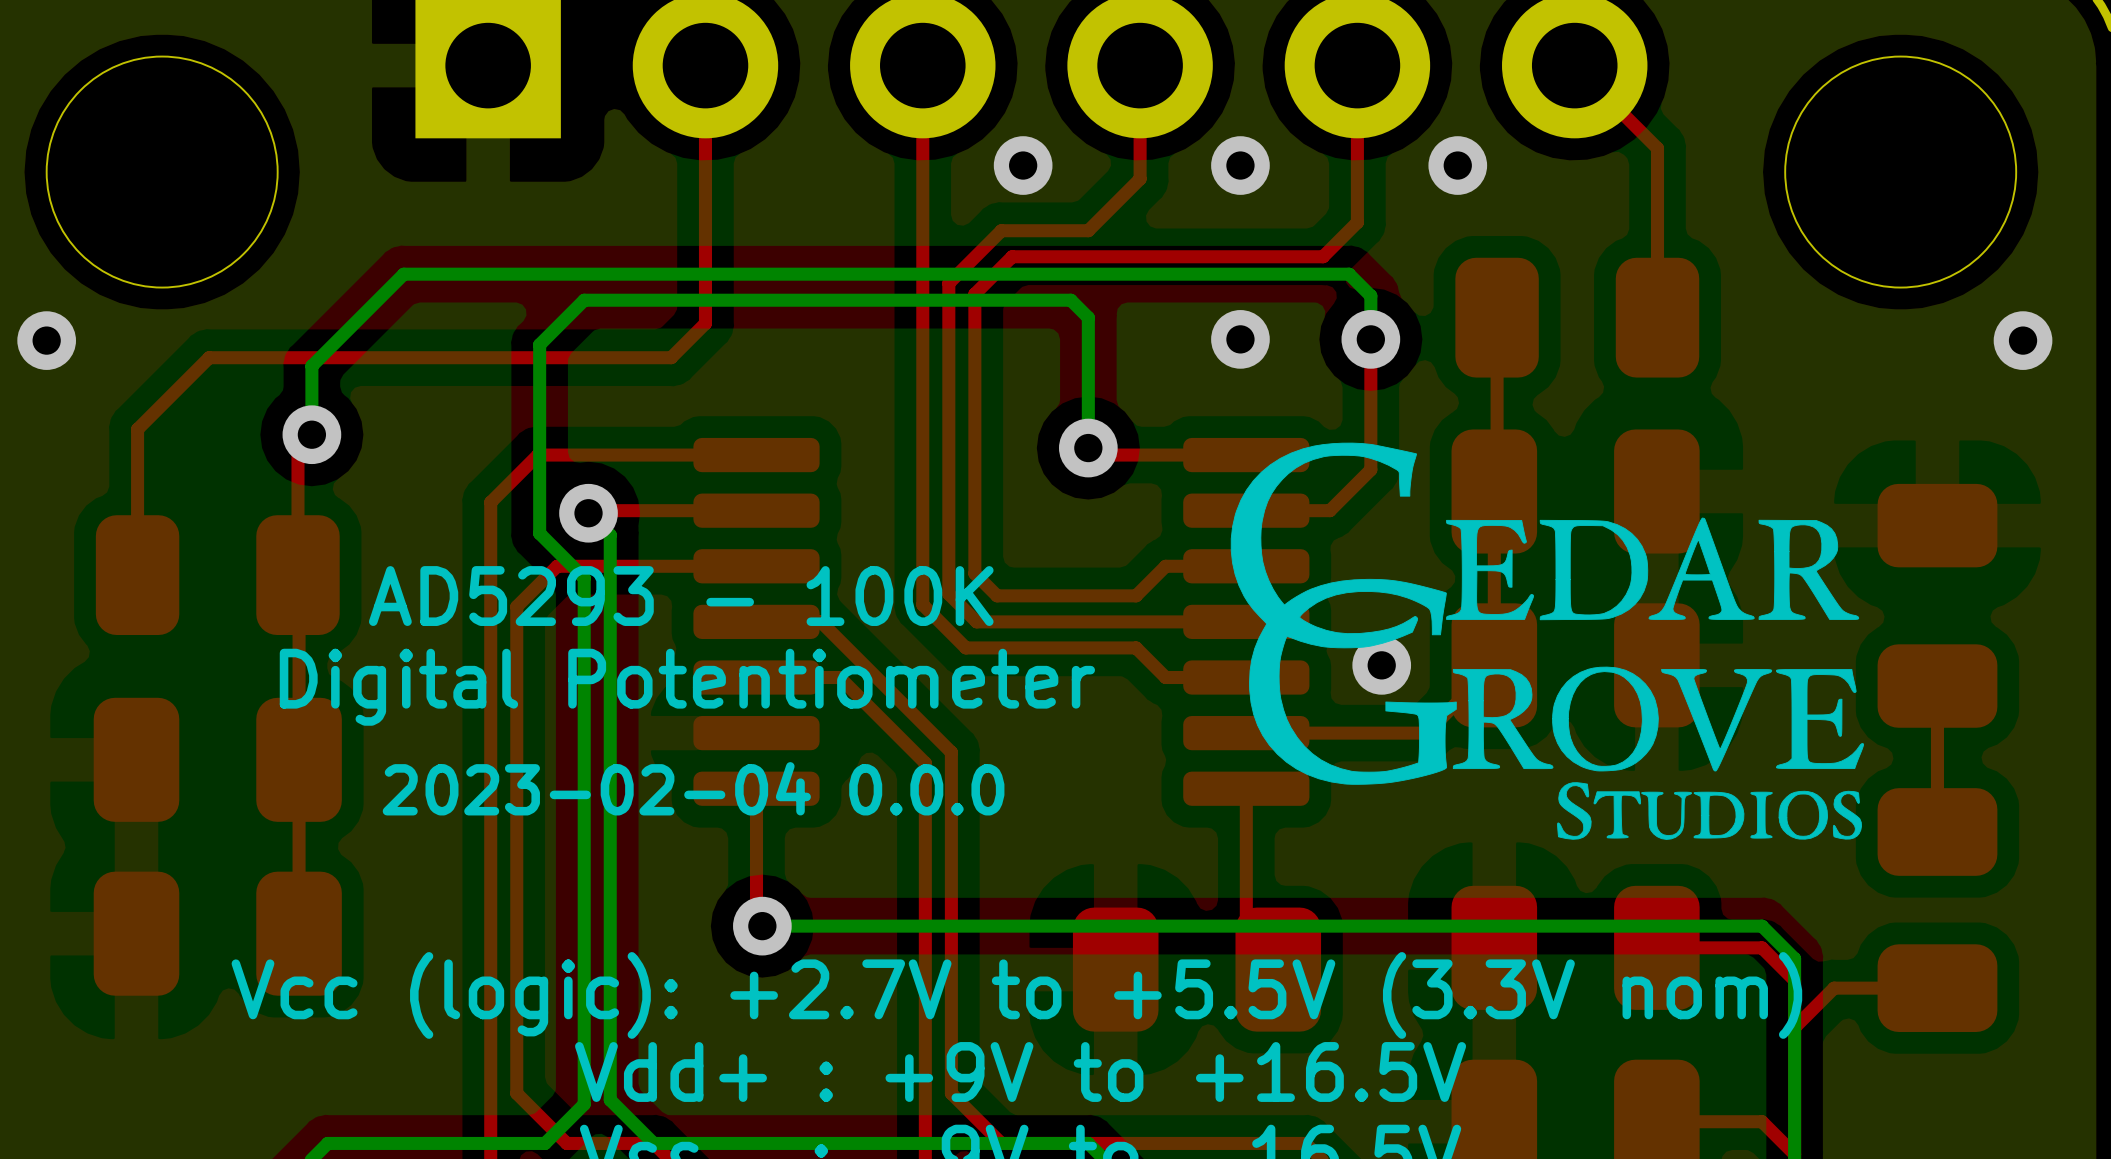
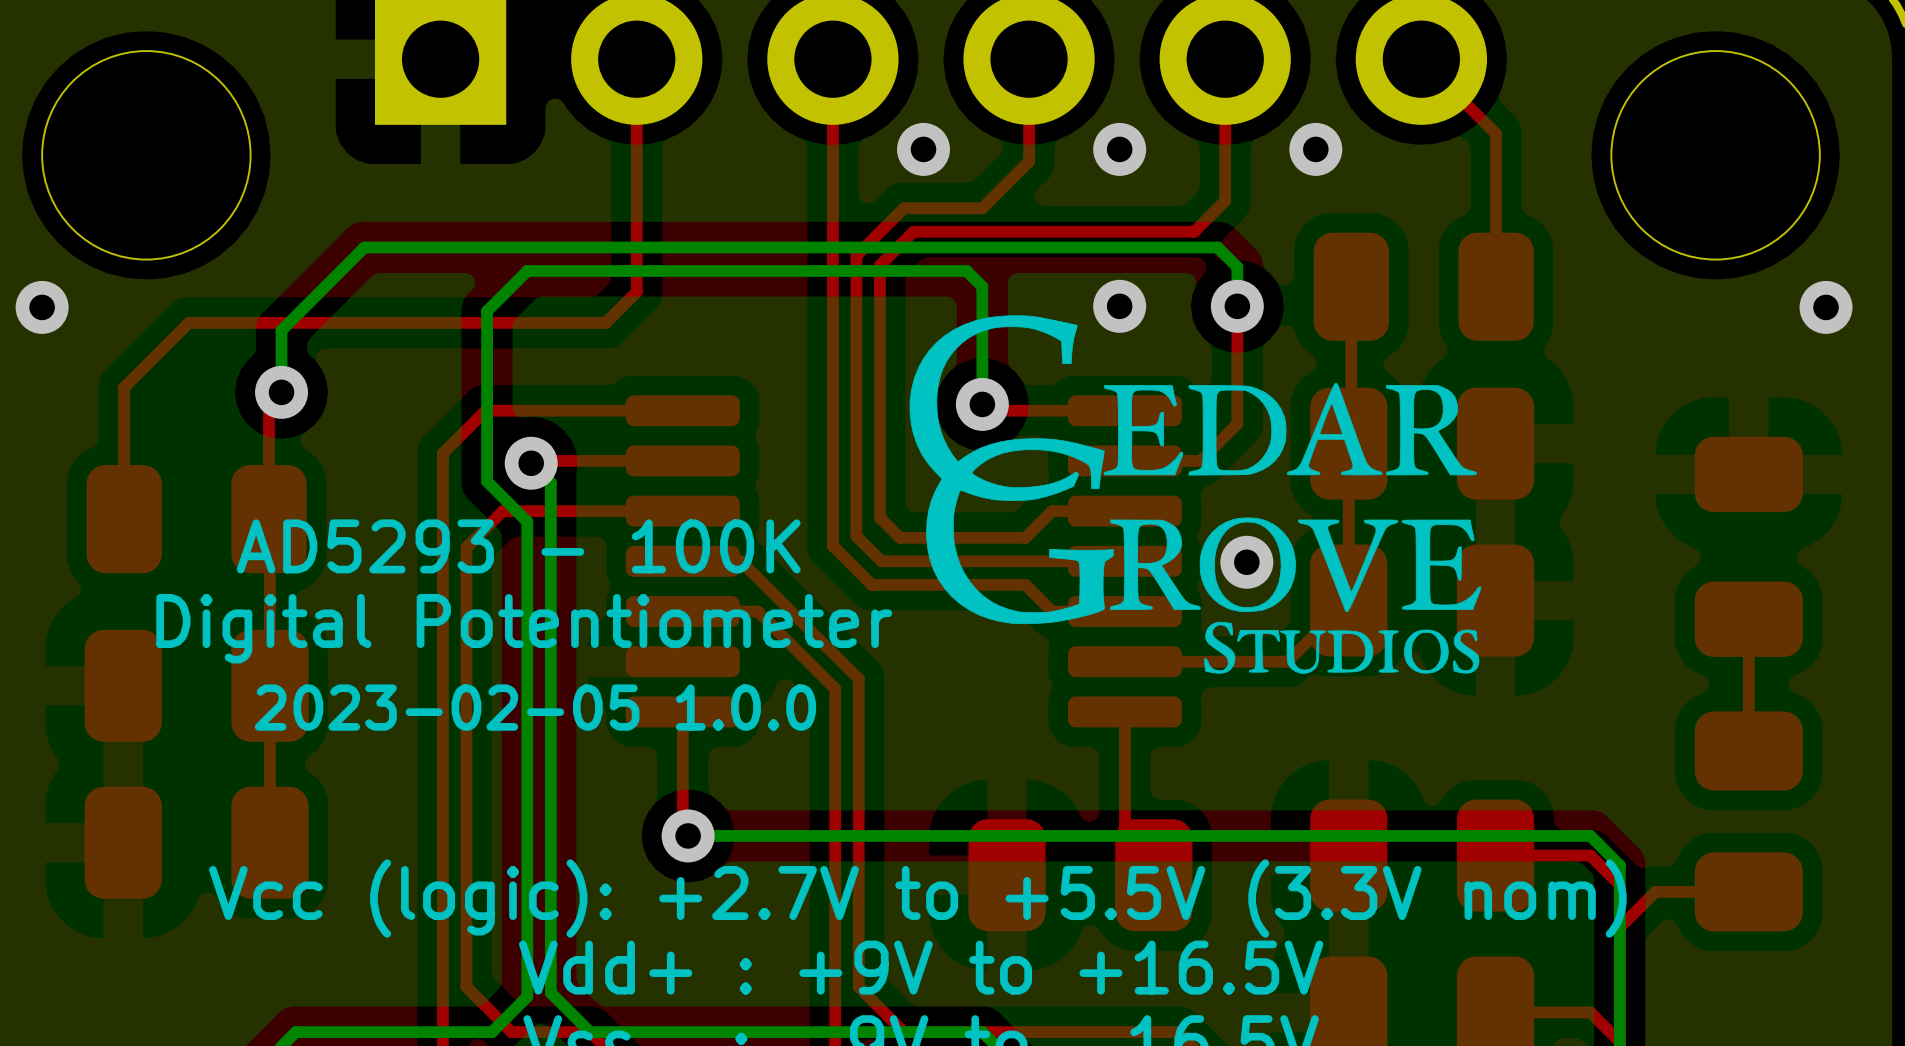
text position: AD5293 - 100K (681, 596) -> AD5293 - 100K (518, 546)
drawing position: (1547, 641) -> (1195, 494)
via position: (1381, 665) -> (1246, 562)
text position: Digital Potentiometer (687, 687) -> Digital Potentiometer (524, 628)
text: 2023-02-04 0.0.0 (693, 788) -> 2023-02-05 1.0.0 (535, 707)

